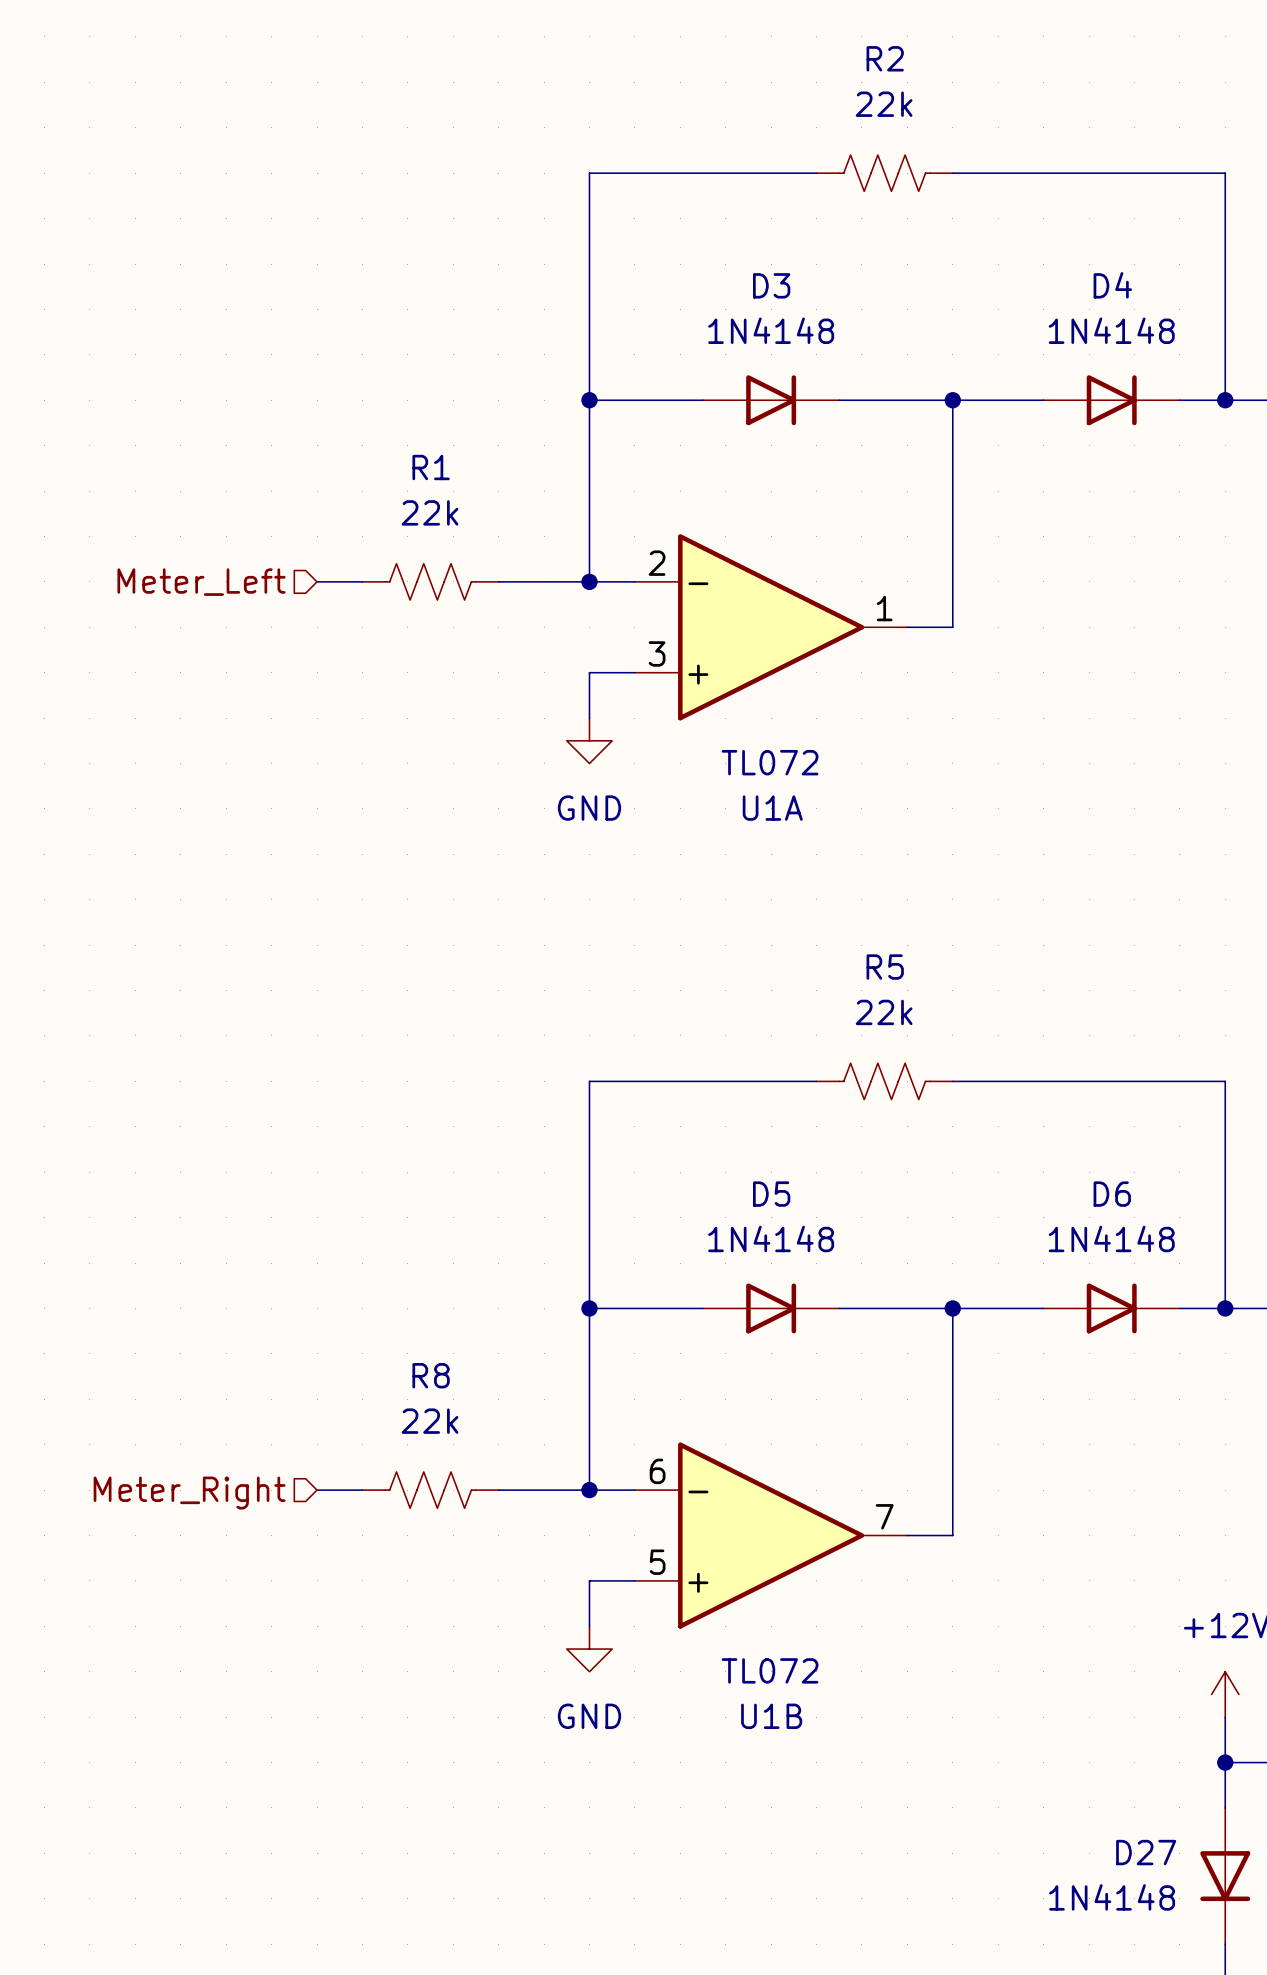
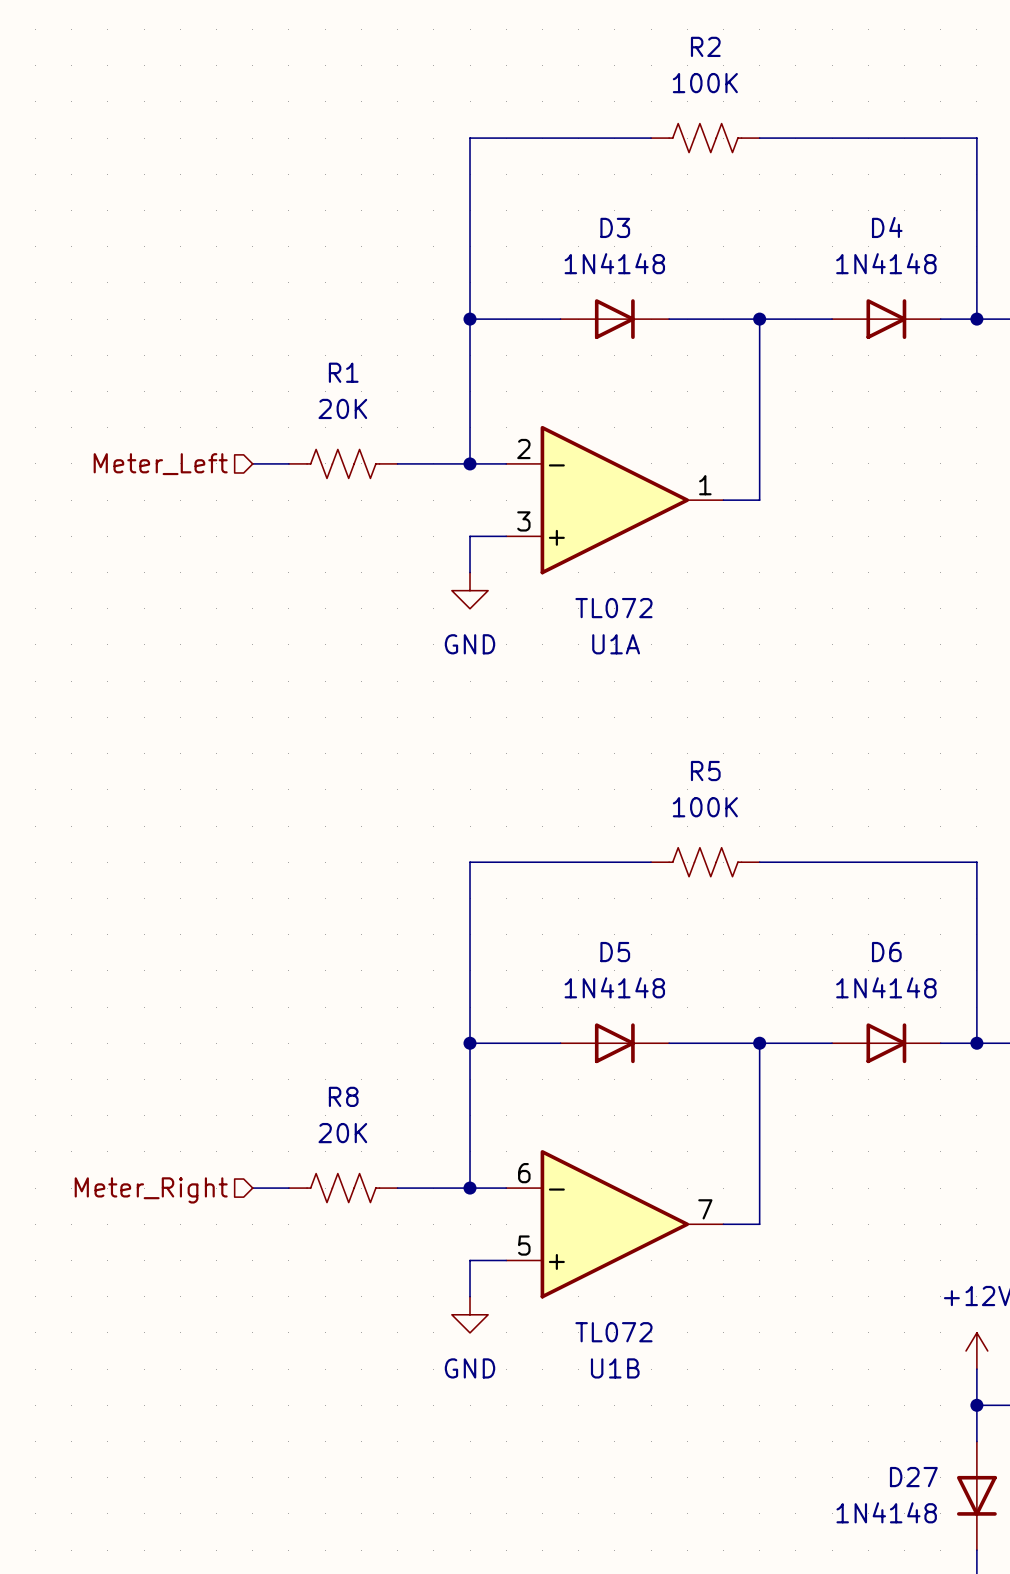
R2 value: 22k (884, 104) -> 100K (705, 83)
R1 value: 22k (430, 512) -> 20K (342, 408)
R5 value: 22k (884, 1012) -> 100K (705, 807)
R8 value: 22k (430, 1421) -> 20K (342, 1133)

